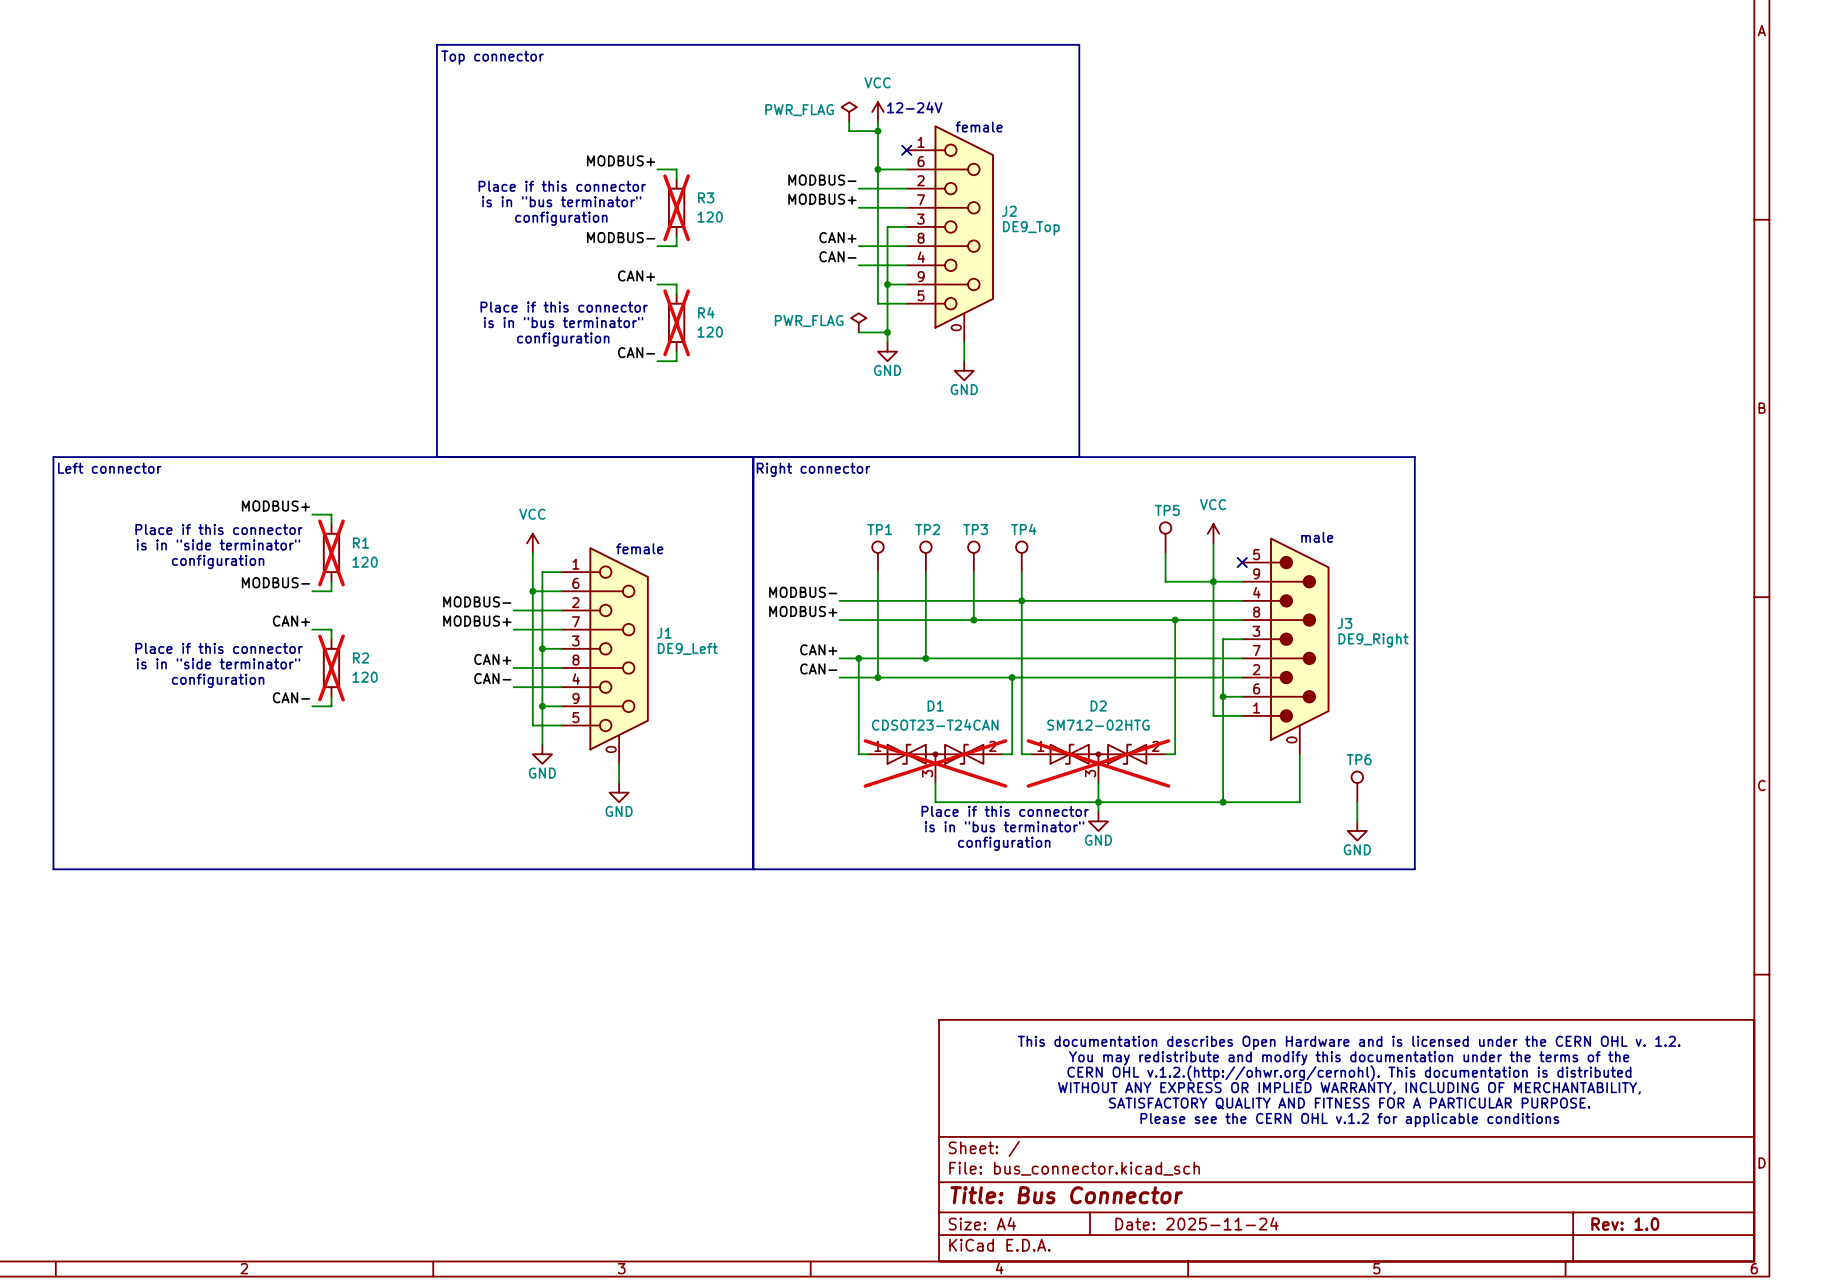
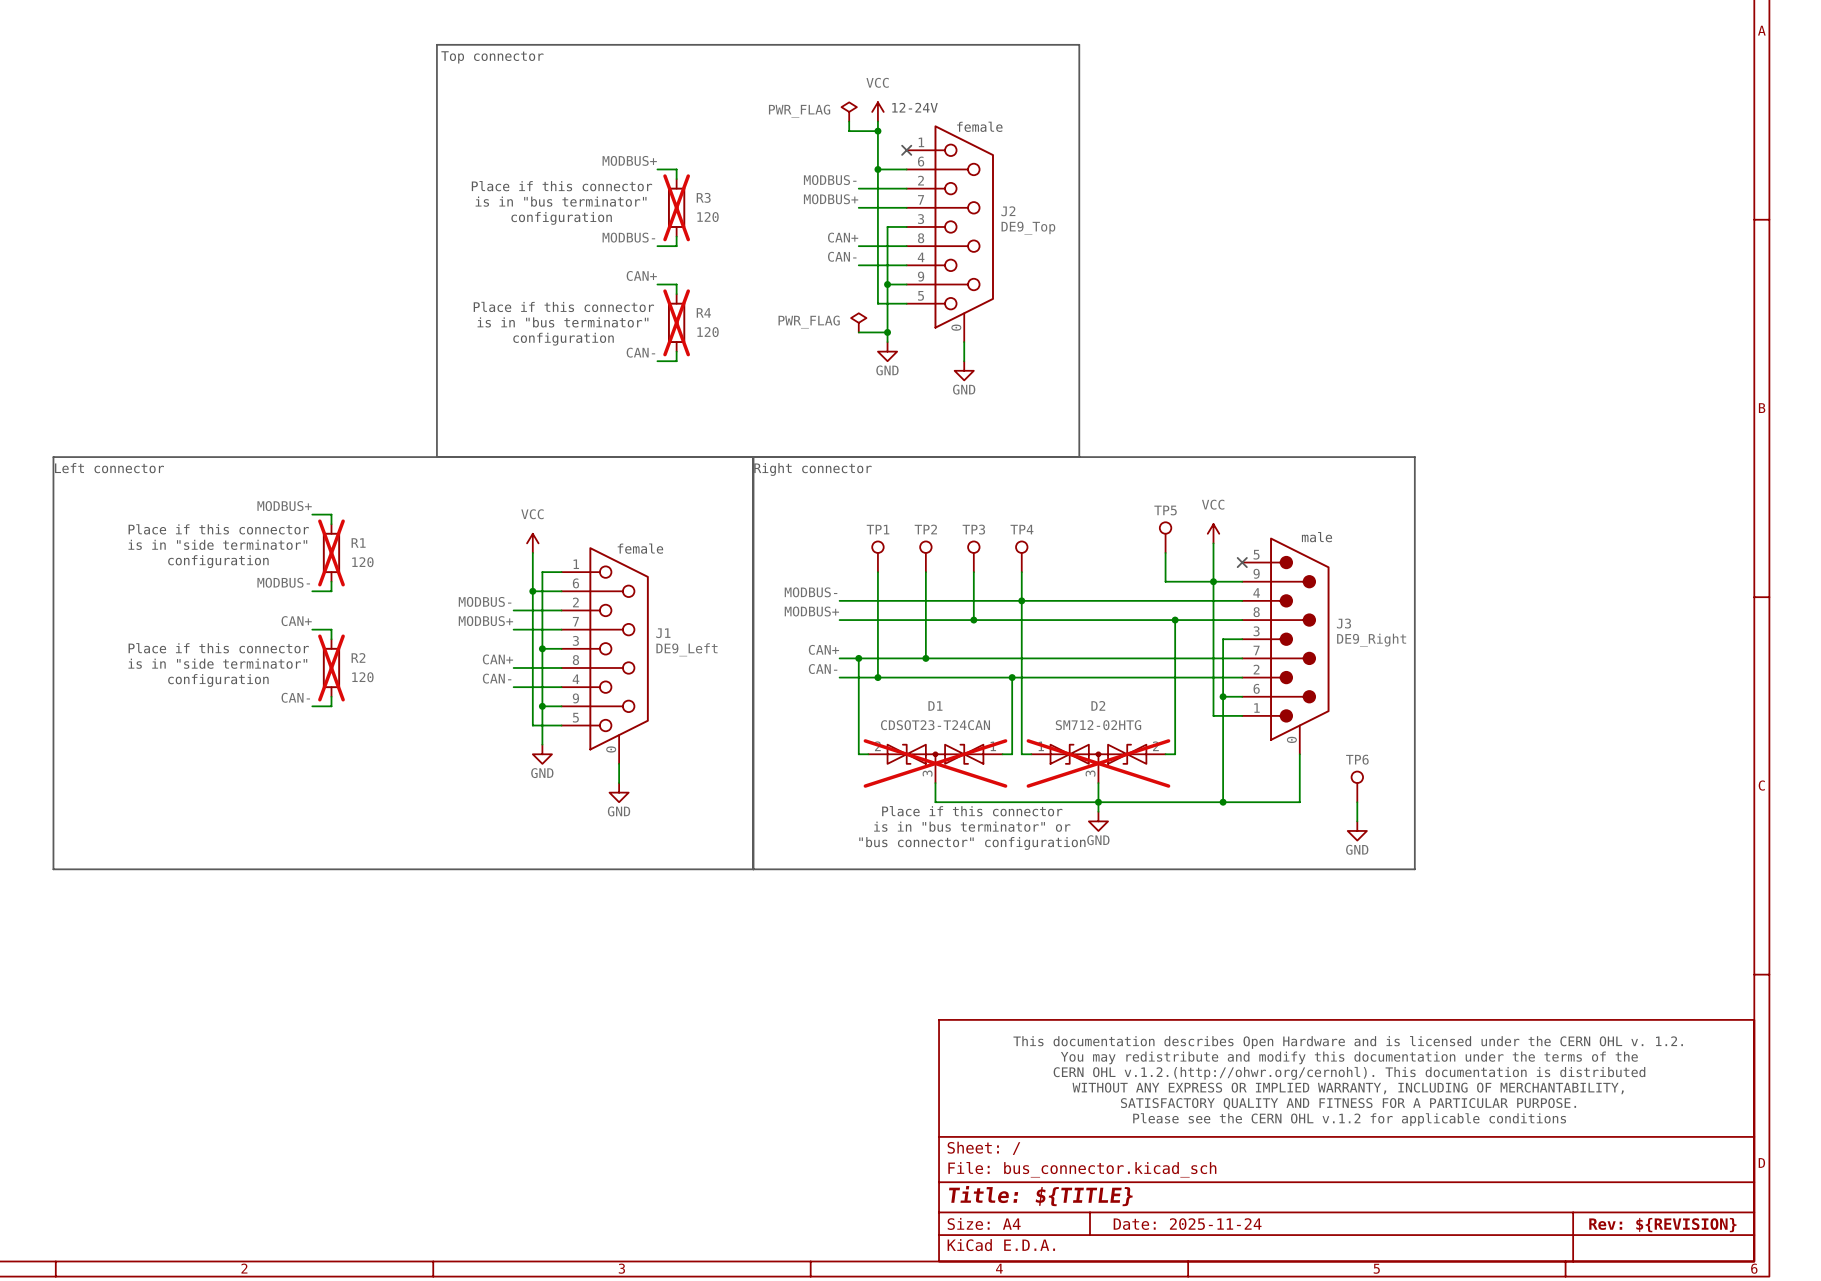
D1 flip: as is (935, 754) -> left-right (935, 754)
text position: Place if this connector (1005, 811) -> Place if this connector (972, 811)
text: is in "bus terminator" (1004, 826) -> is in "bus terminator" or (972, 826)
text: configuration (1004, 843) -> "bus connector" configuration (972, 843)
title block: Title: Bus Connector (1066, 1195) -> Title: ${TITLE} (1040, 1196)
title block: Rev: 1.0 (1625, 1224) -> Rev: ${REVISION} (1662, 1225)

